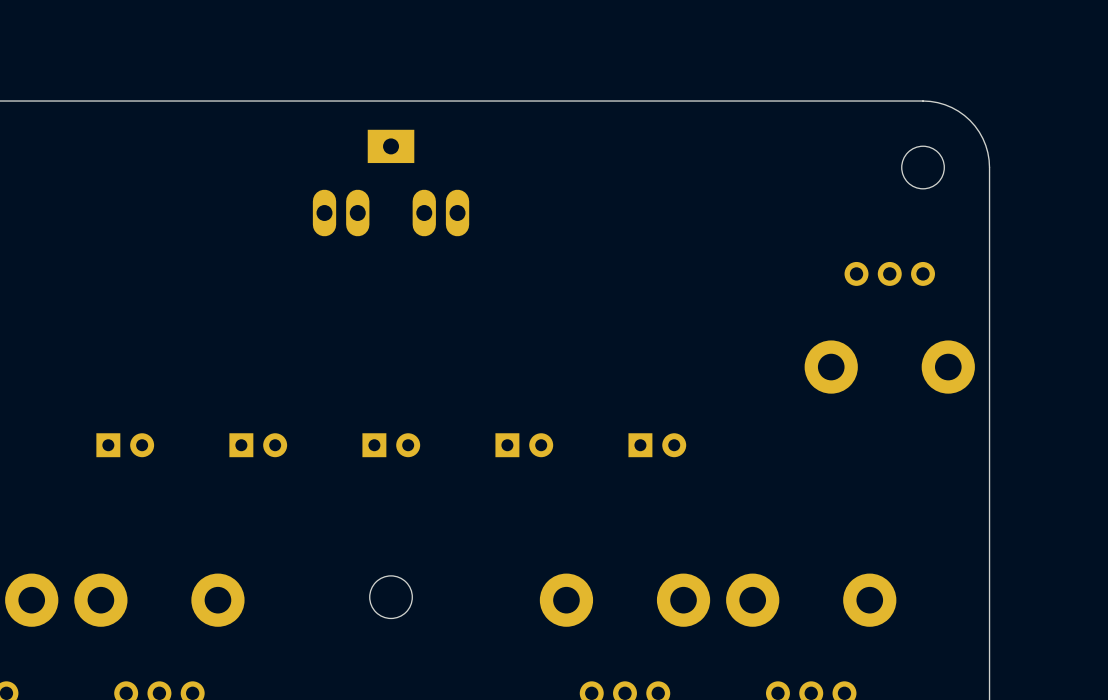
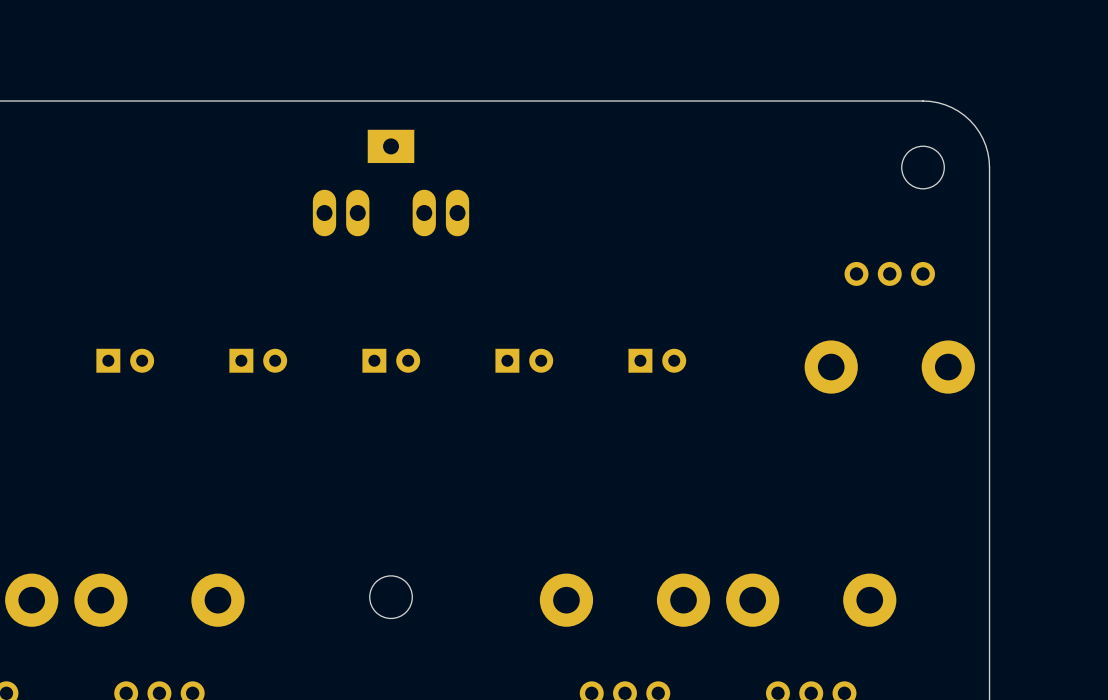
part: none -> (125, 360)
part: none -> (258, 360)
part: none -> (391, 360)
part: none -> (524, 360)
part: none -> (657, 360)
part: (125, 445) -> none
part: (258, 445) -> none
part: (391, 445) -> none
part: (524, 445) -> none
part: (657, 445) -> none

